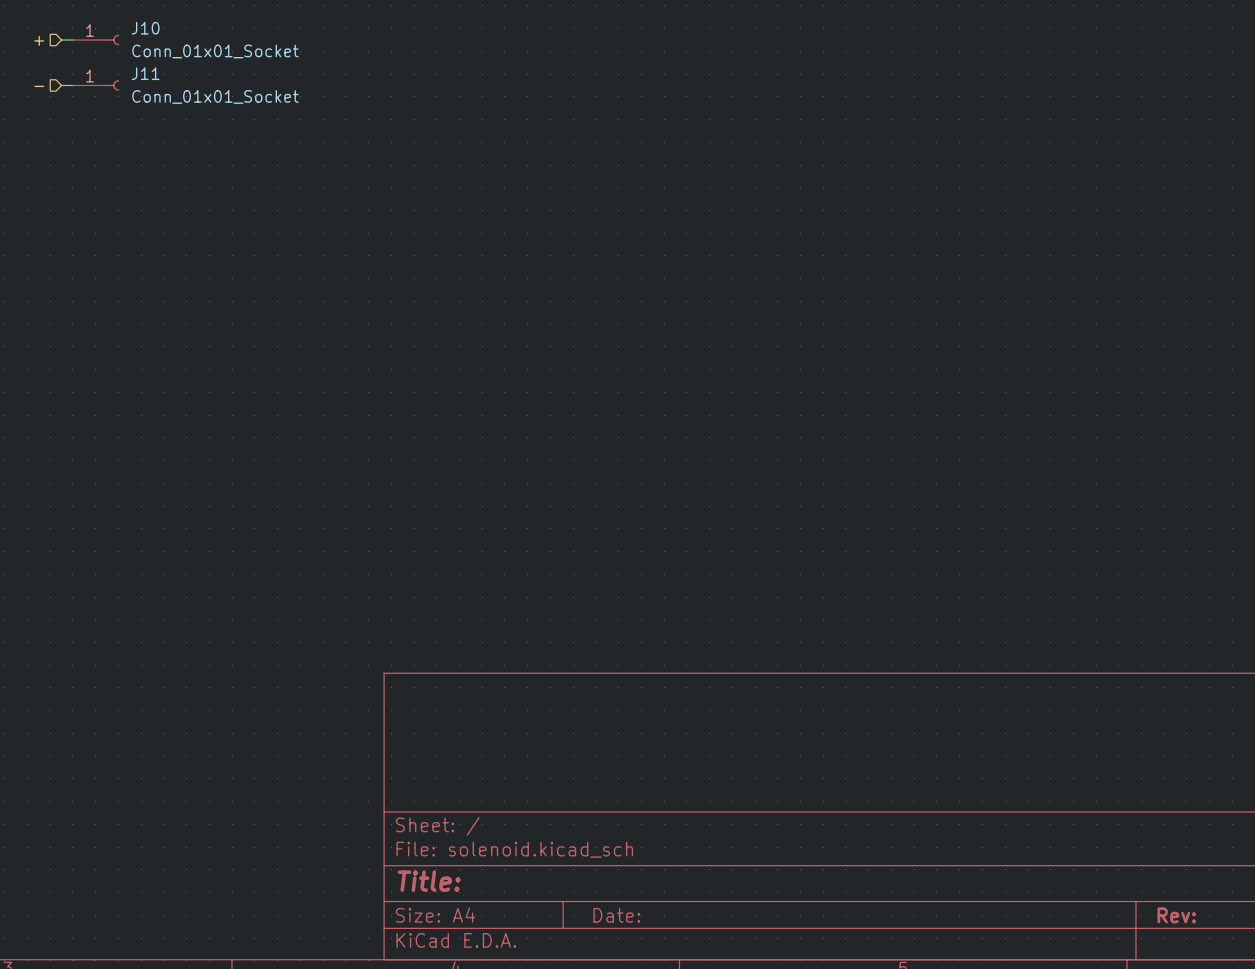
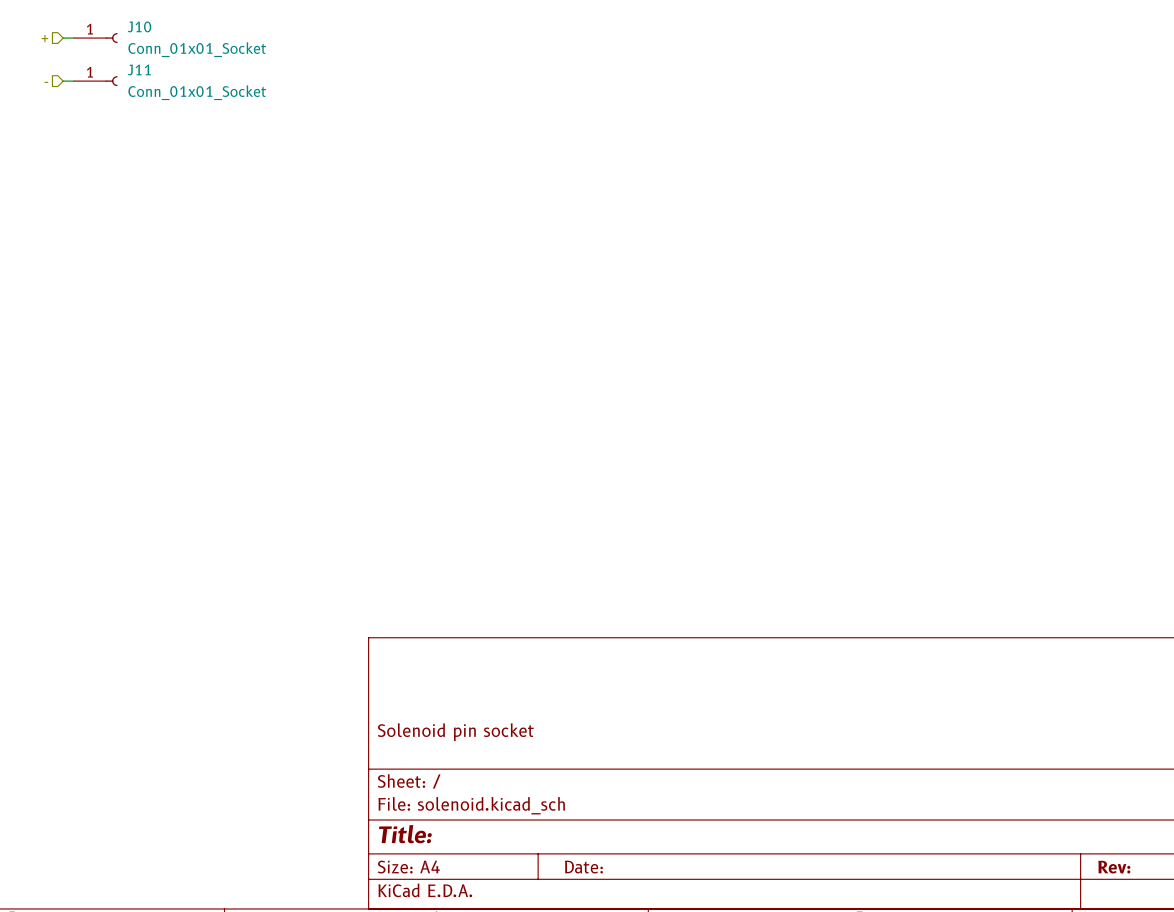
title block: none -> Solenoid pin socket (455, 732)

